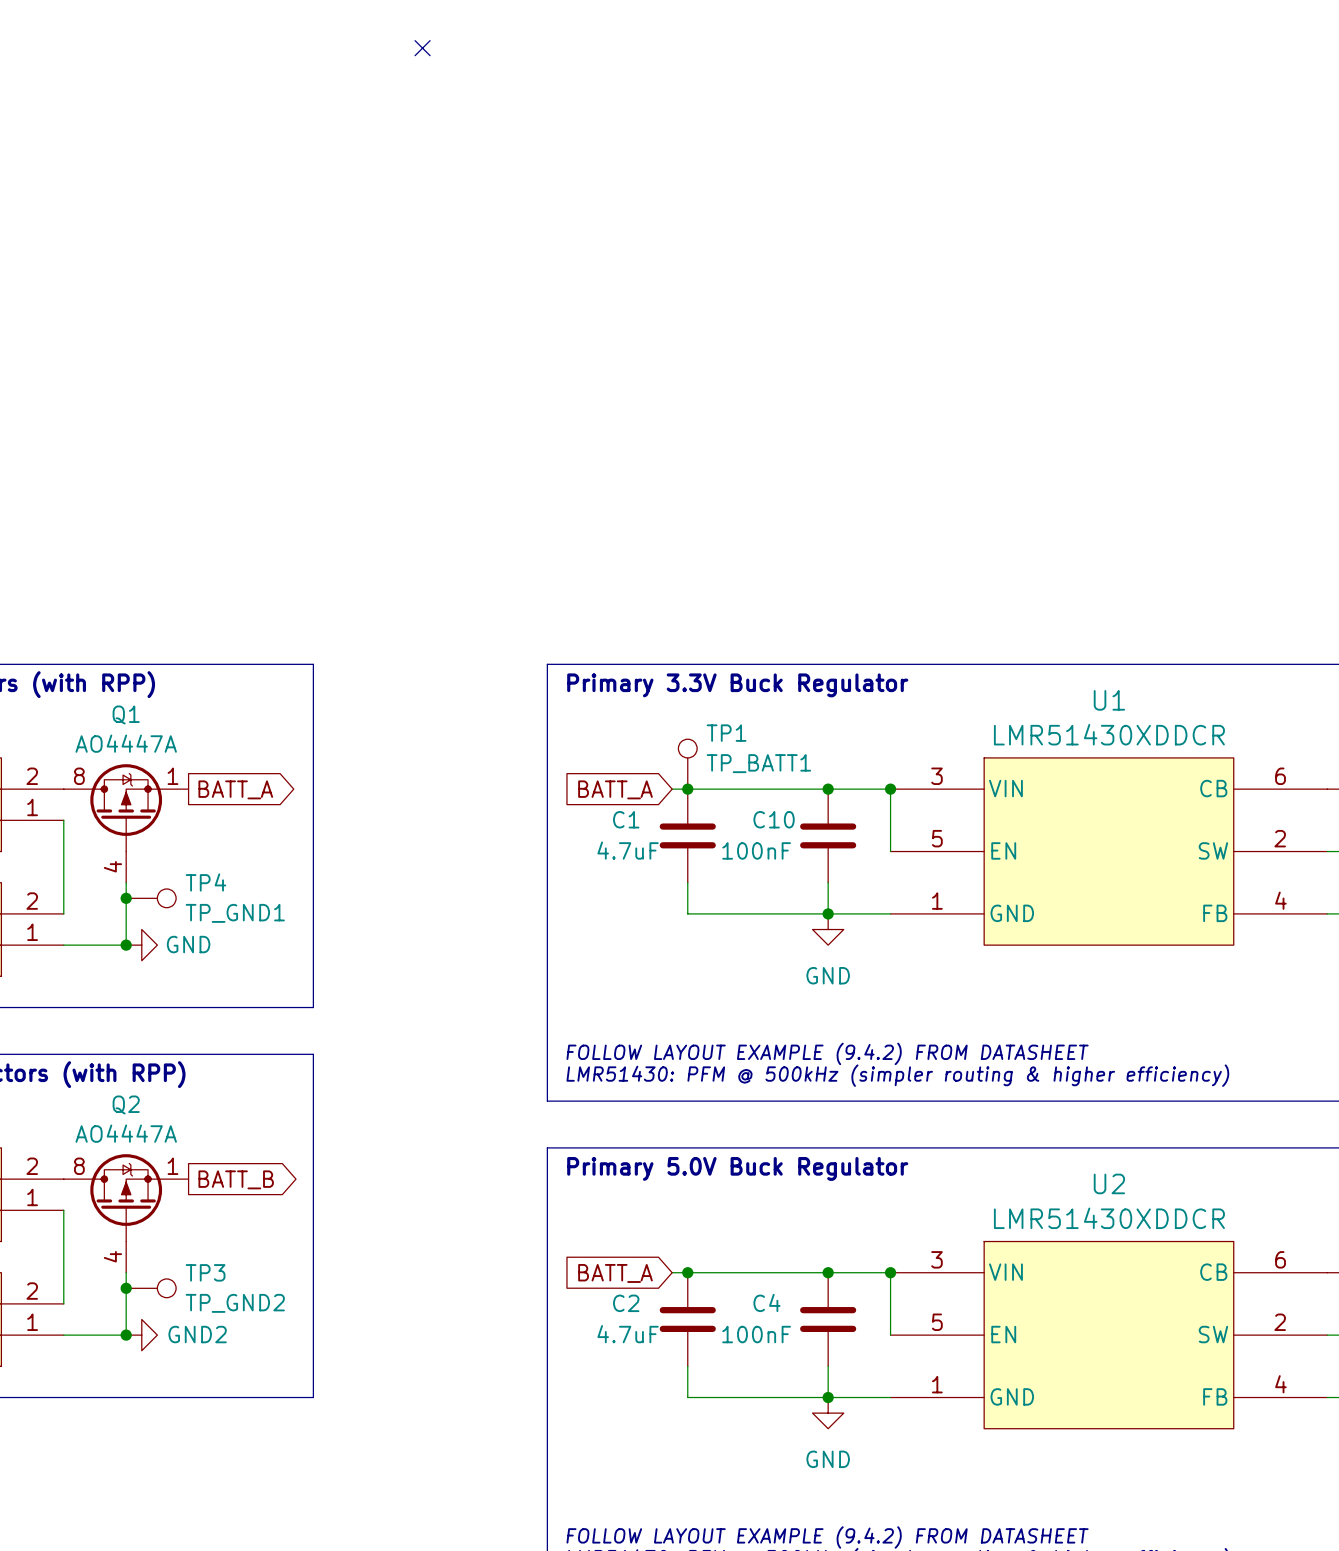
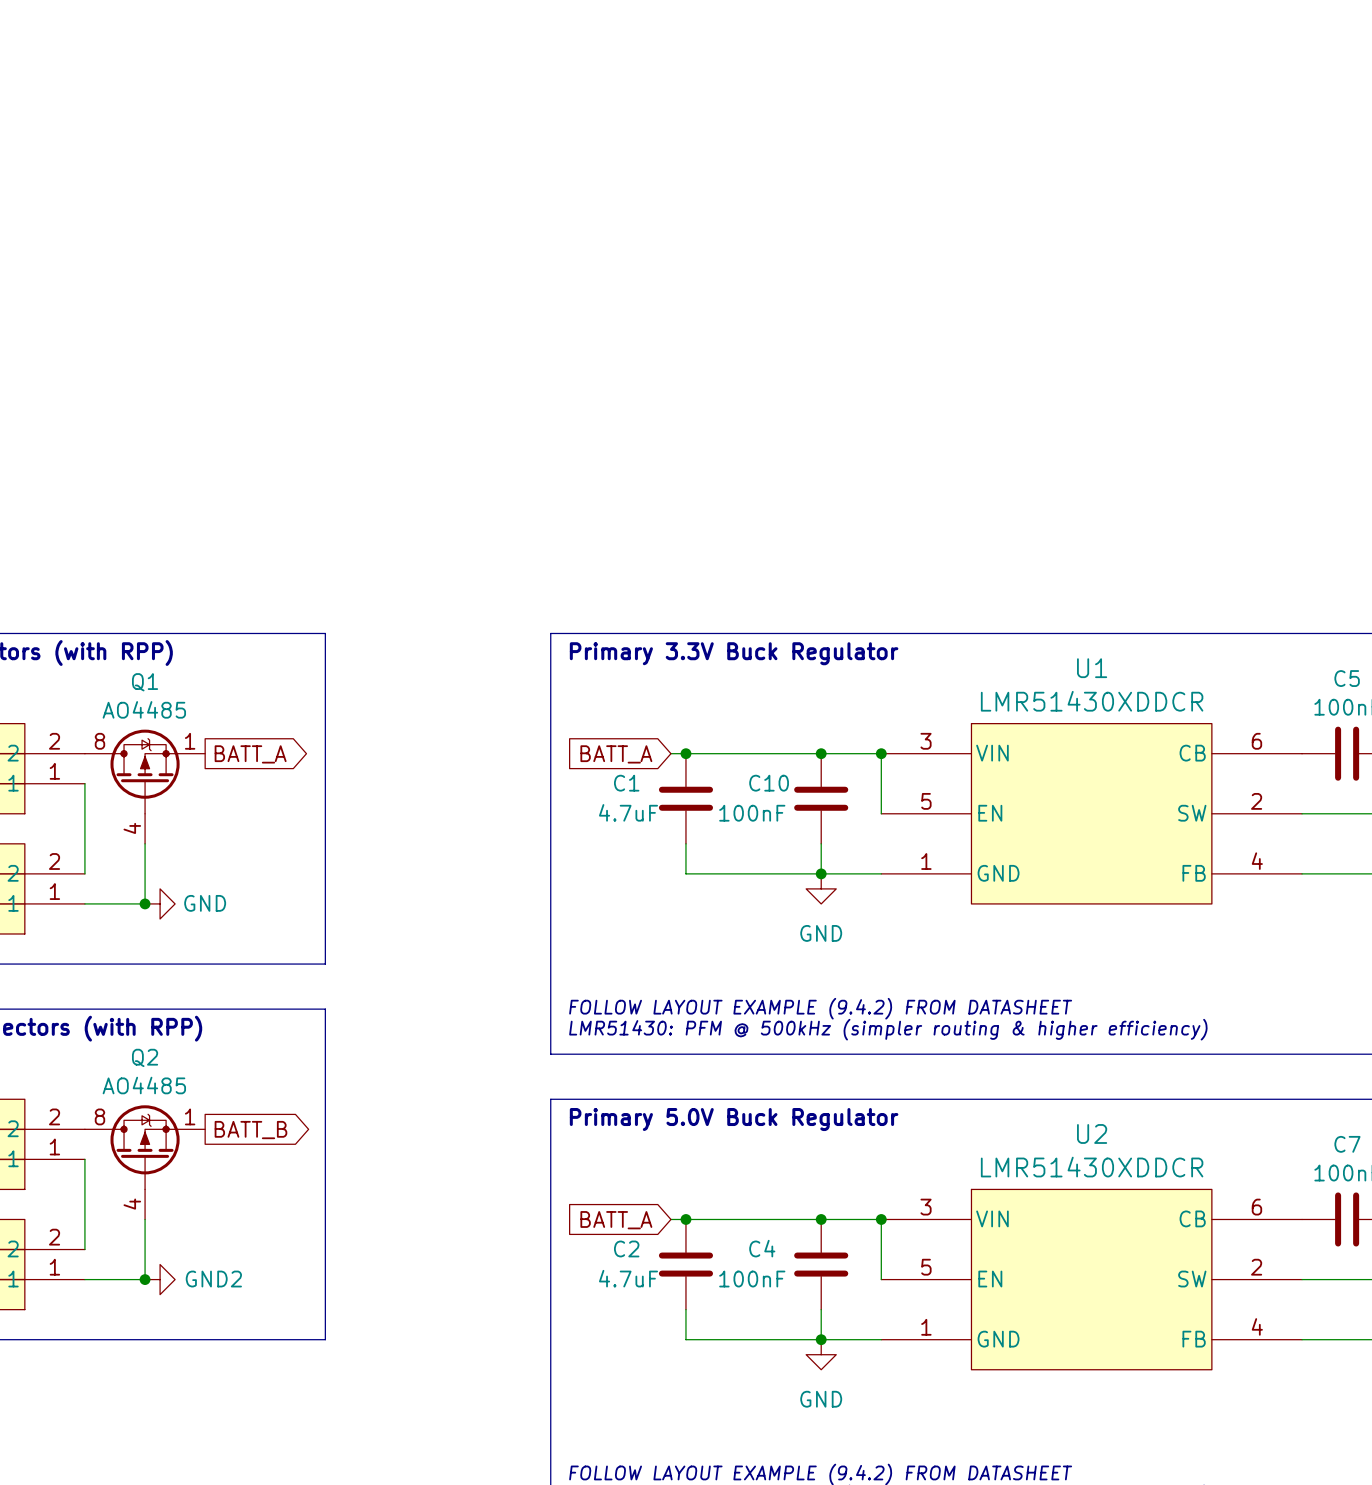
no-connect mark: (422, 48) -> none
Q1 value: AO4447A (126, 743) -> AO4485 (144, 709)
TP1: TP_BATT1 (687, 764) -> none
junction: (126, 898) -> none
TP4: TP_GND1 (151, 898) -> none
Q2 value: AO4447A (126, 1133) -> AO4485 (144, 1085)
junction: (126, 1288) -> none
TP3: TP_GND2 (151, 1288) -> none

